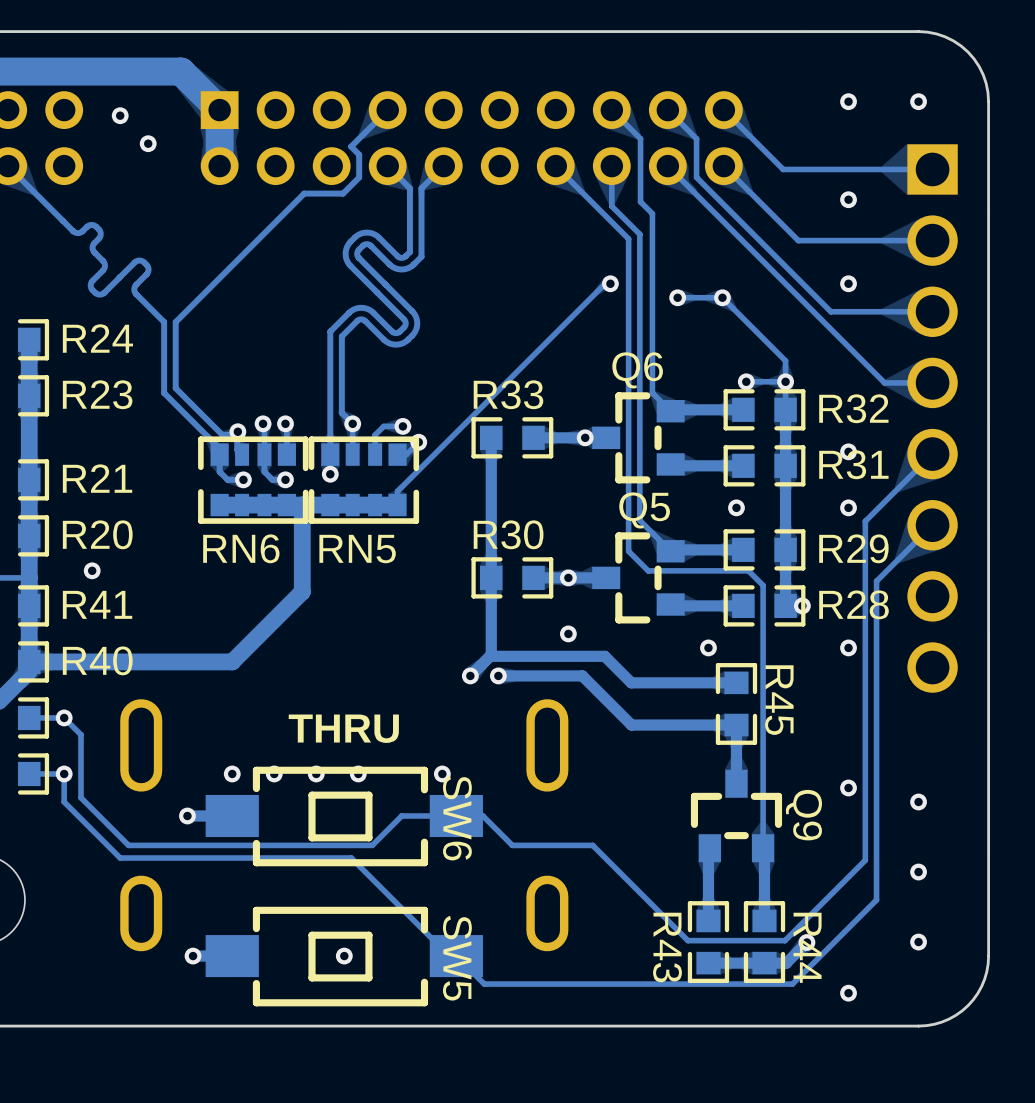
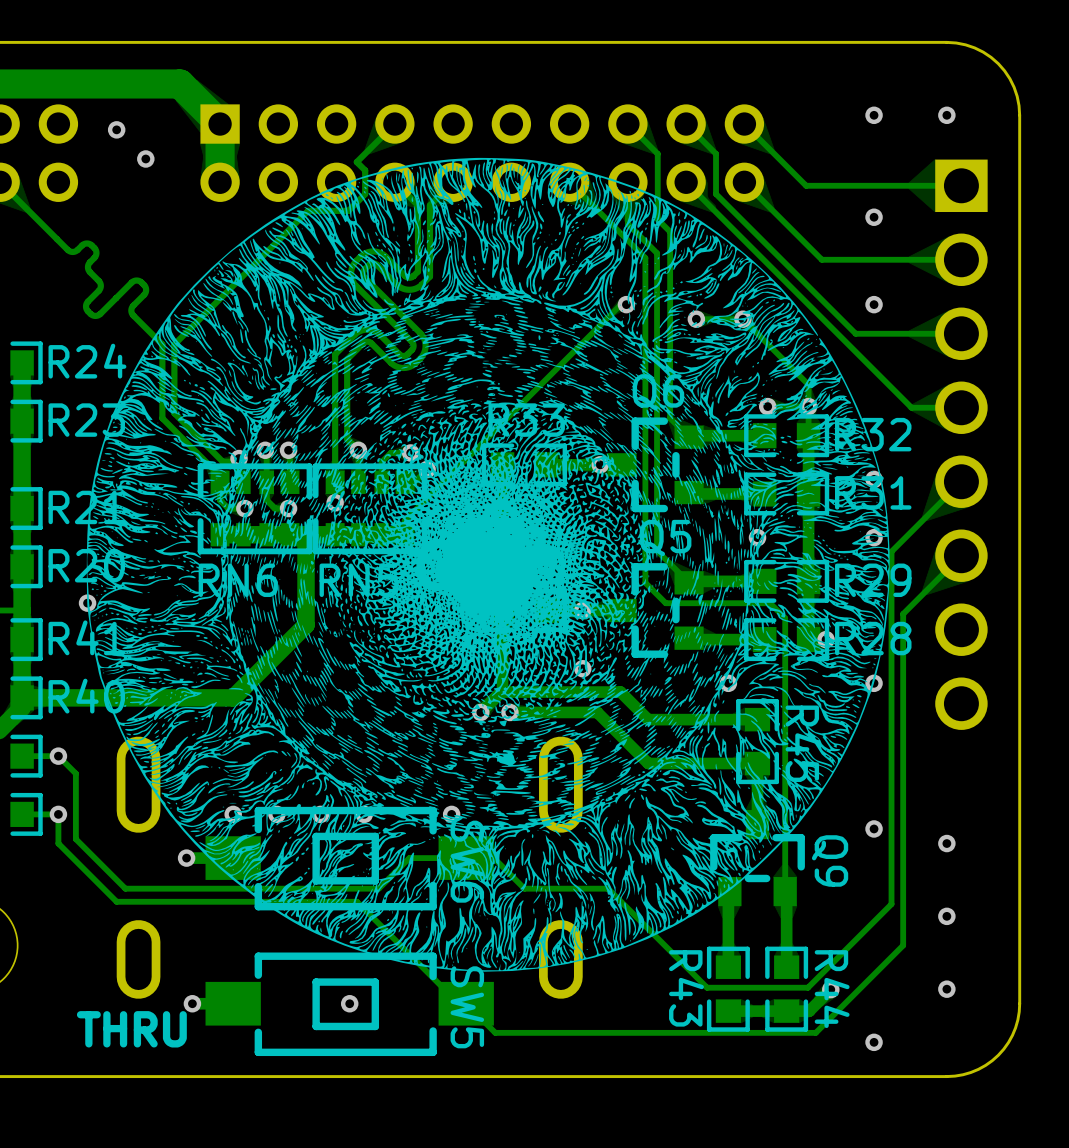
part: none -> (488, 564)
text position: THRU (343, 728) -> THRU (131, 1029)

